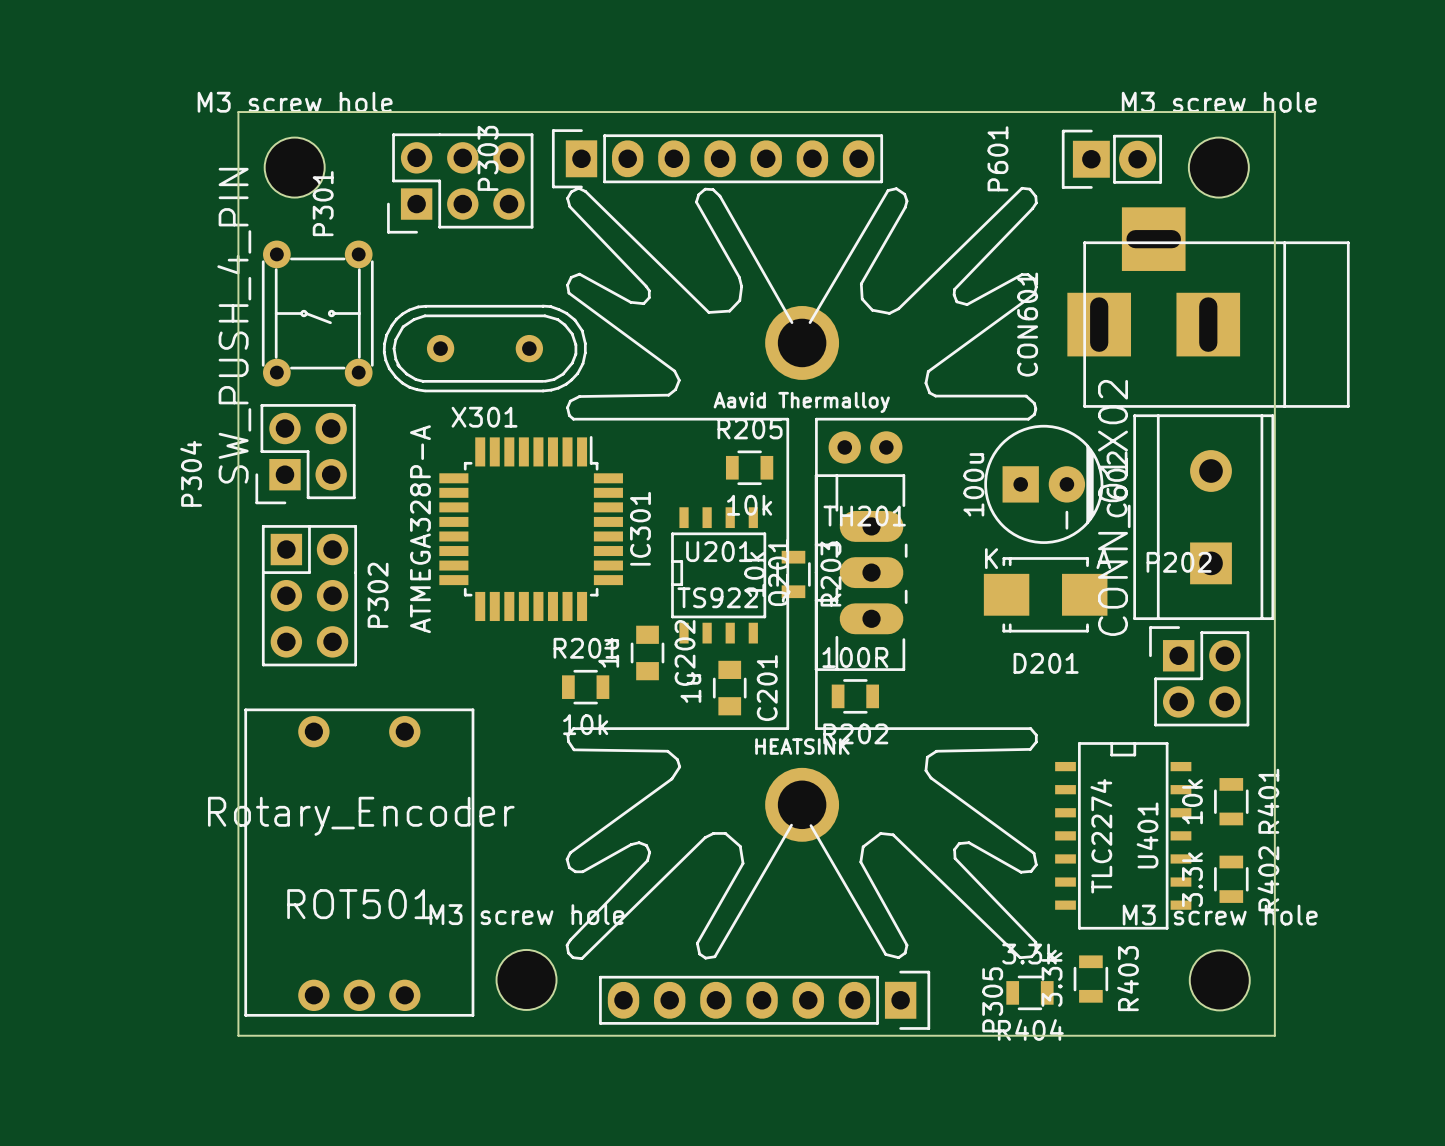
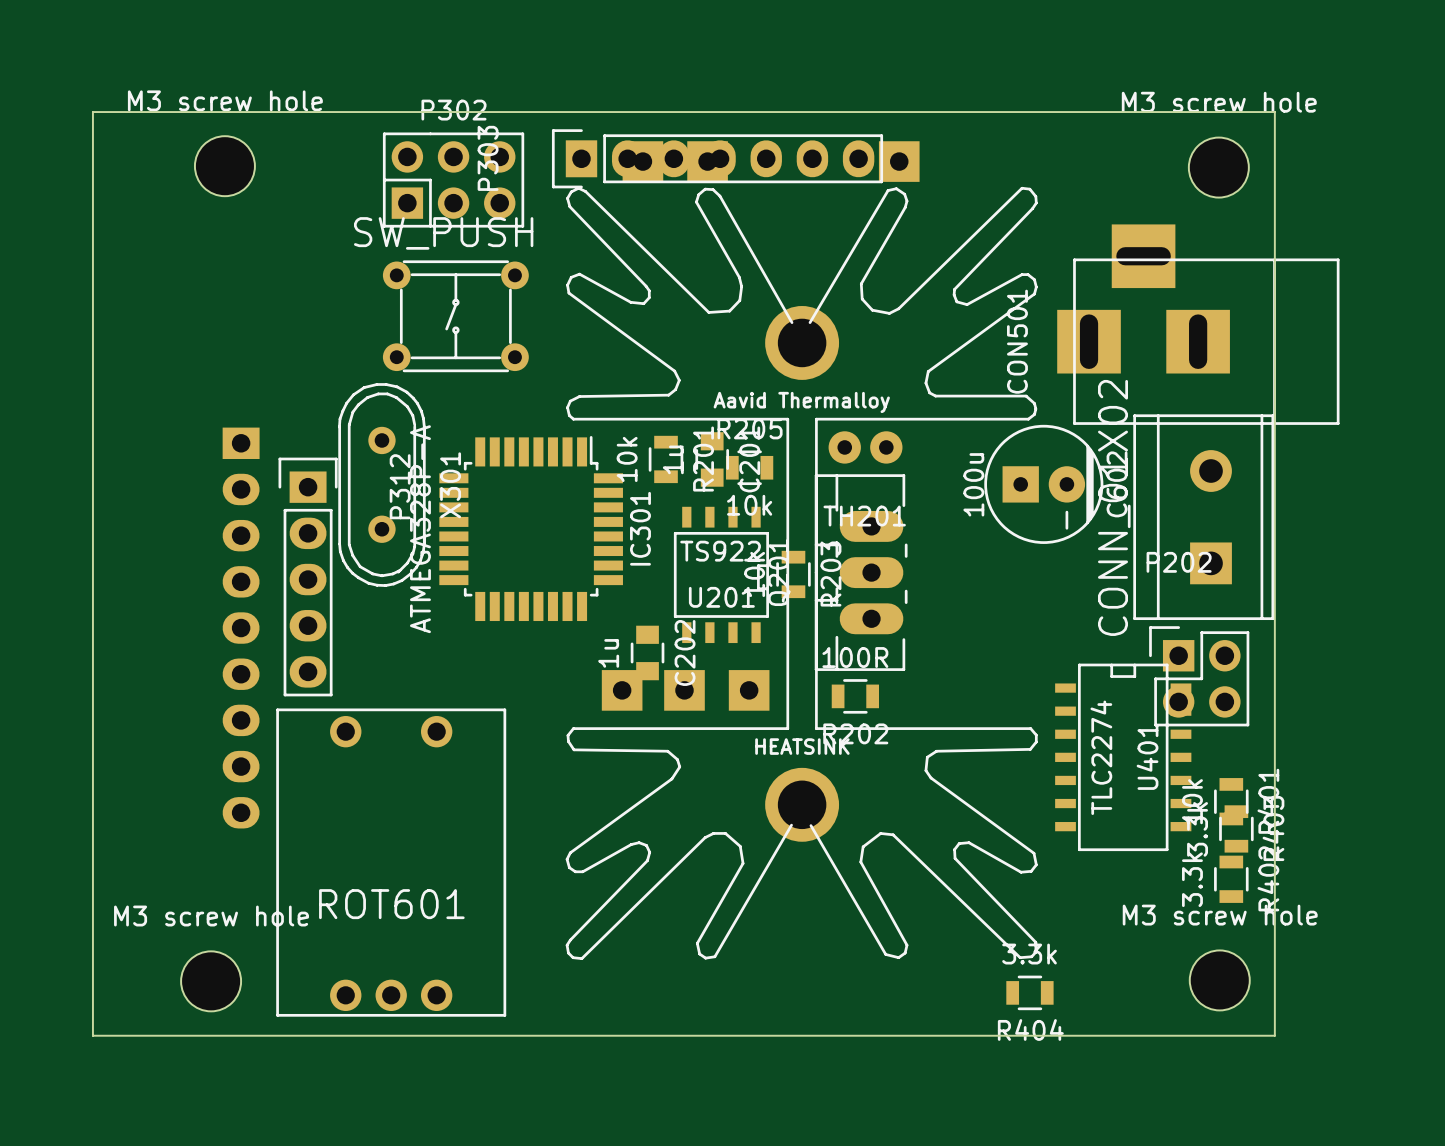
board edge: (238, 112) (238, 1035) -> (238, 112) (92, 112) (92, 1035) (238, 1035)
P601: (1111, 159) -> none
part: none -> (642, 161)
part: none -> (707, 161)
part: none -> (899, 161)
M3 screw hole position: (294, 167) -> (224, 166)
P301: (460, 183) -> none
CON601: (1208, 307) -> none
part: SW_PUSH_4_PIN (317, 313) -> none
part: none -> SW_PUSH (455, 316)
CON501: none -> (1198, 324)
X301 rotation: 0° (484, 348) -> 90° counterclockwise (381, 485)
X301 position: (484, 348) -> (381, 485)
P304: (305, 454) -> none
U201 rotation: 0° (718, 575) -> 180° (721, 574)
P312: none -> (308, 576)
D201: (1045, 594) -> none
P302 rotation: 0° (309, 595) -> 90° counterclockwise (453, 180)
P302 position: (309, 595) -> (453, 180)
part: none -> (241, 628)
R201 rotation: 0° (585, 687) -> 90° clockwise (666, 459)
R201 position: (585, 687) -> (666, 459)
C201 position: (729, 688) -> (712, 459)
part: none -> (622, 690)
part: none -> (684, 690)
part: none -> (749, 690)
U401 position: (1123, 835) -> (1123, 757)
ROT501: Rotary_Encoder (359, 862) -> none
ROT601: none -> (391, 862)
M3 screw hole position: (526, 979) -> (211, 981)
R403 position: (1090, 979) -> (1236, 828)
P305: (764, 1000) -> none

